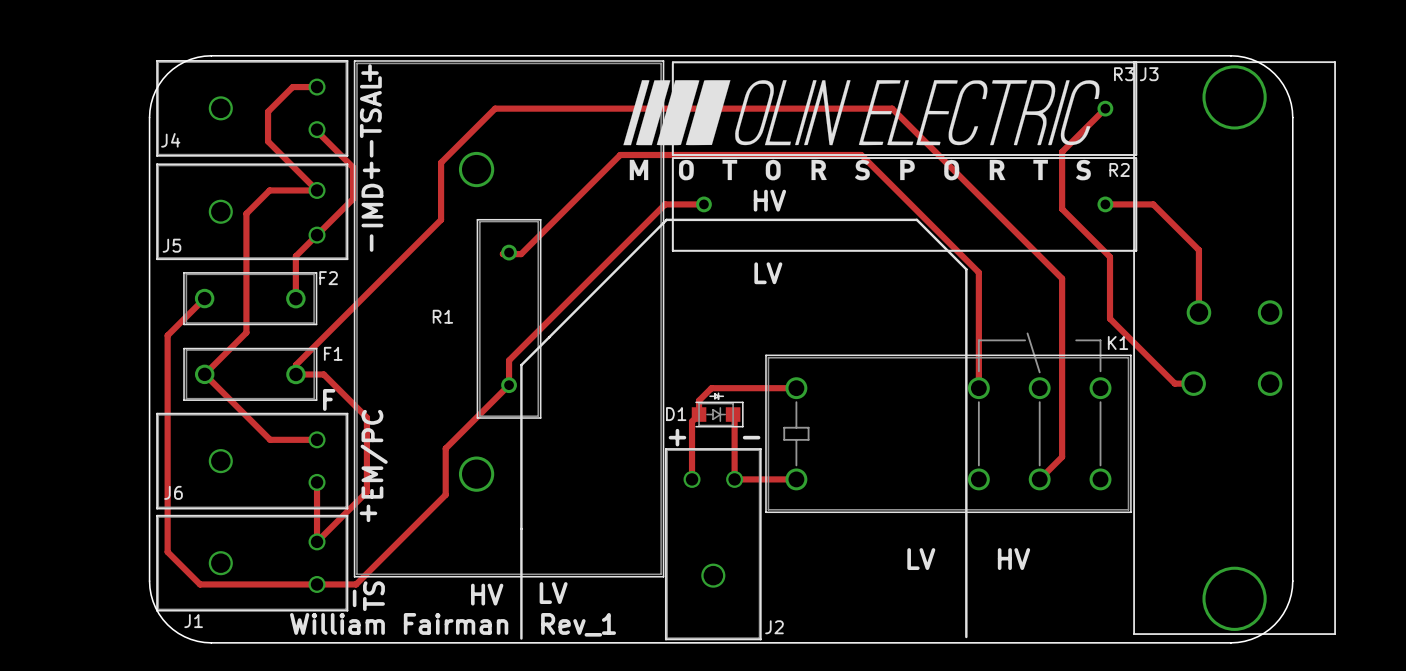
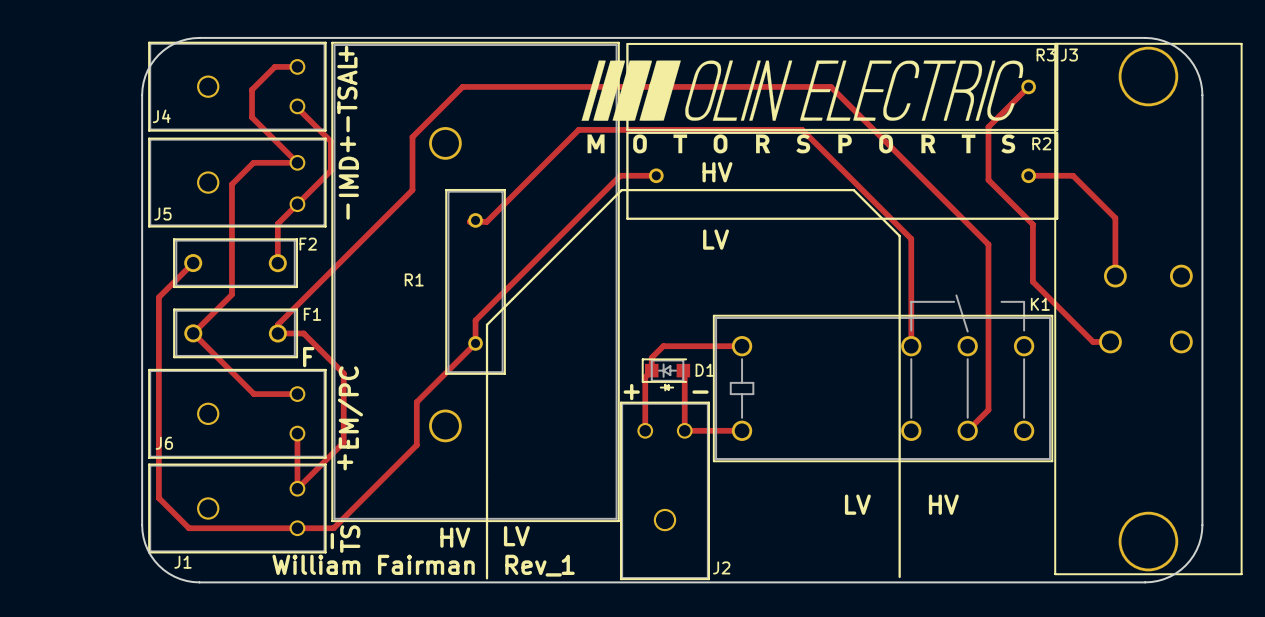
D1 rotation: 0° (717, 410) -> 180° (666, 374)

